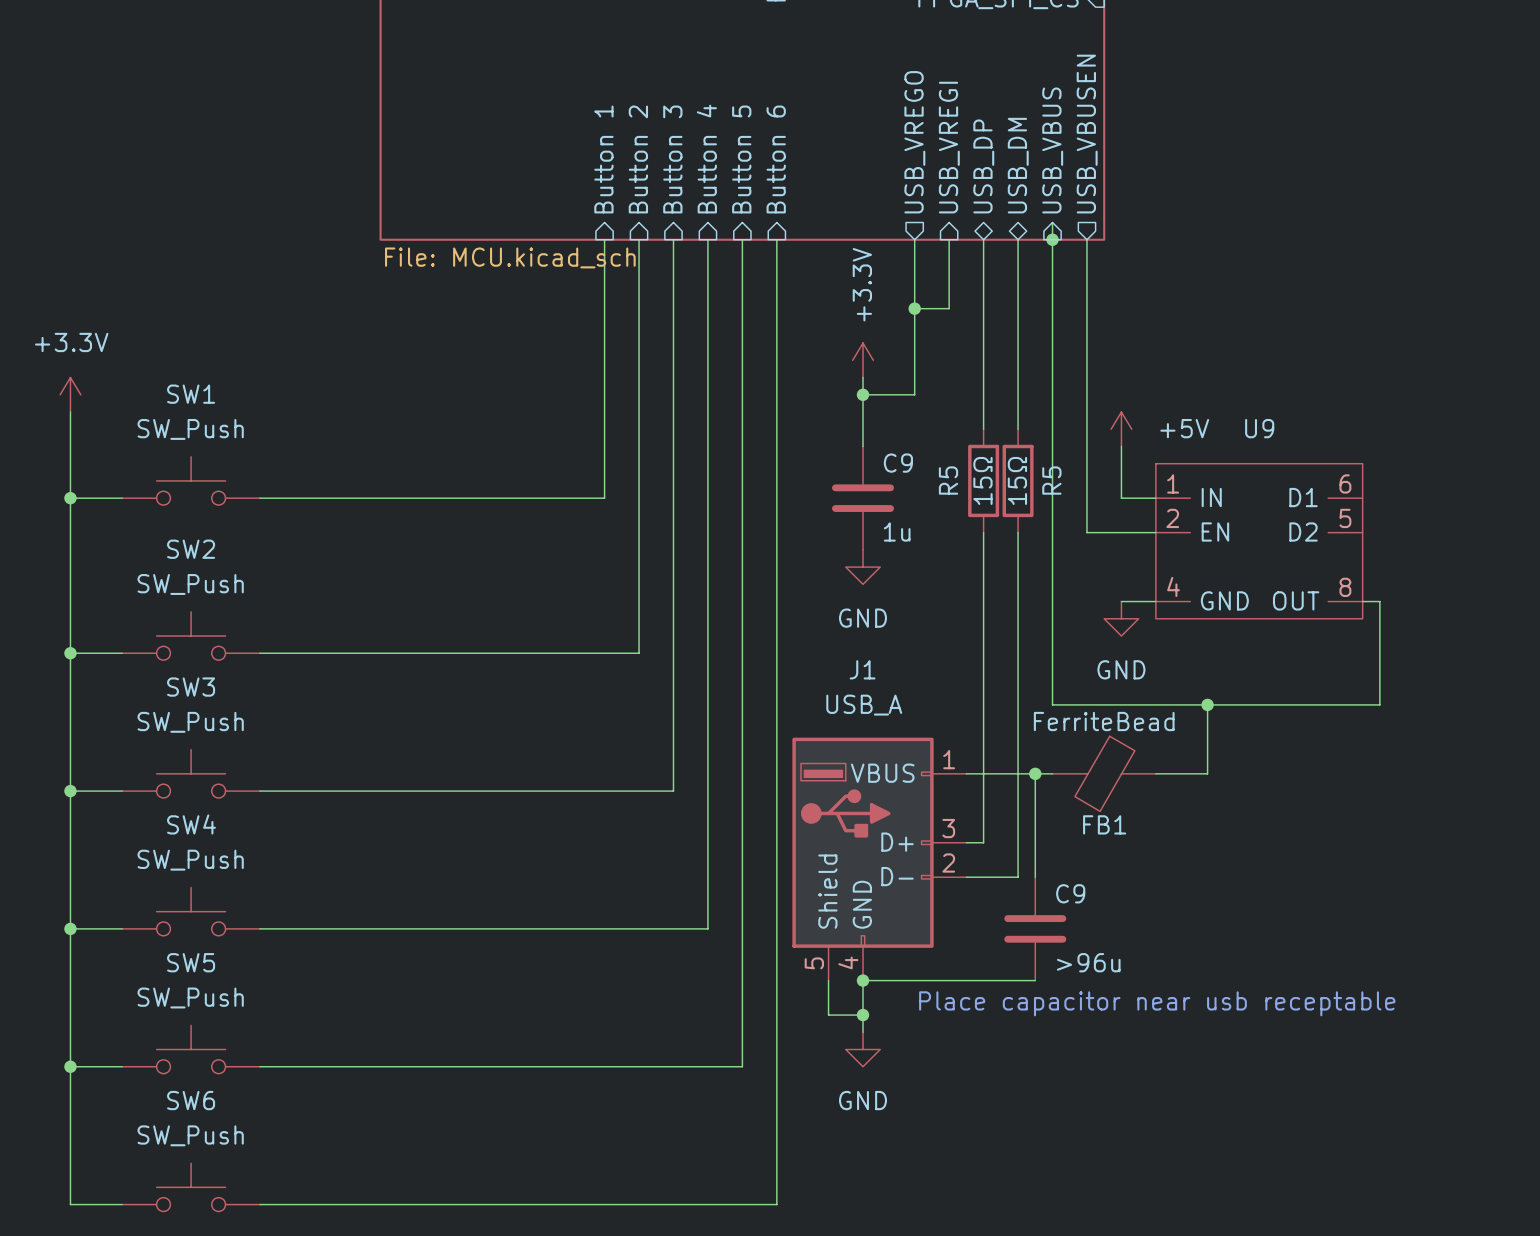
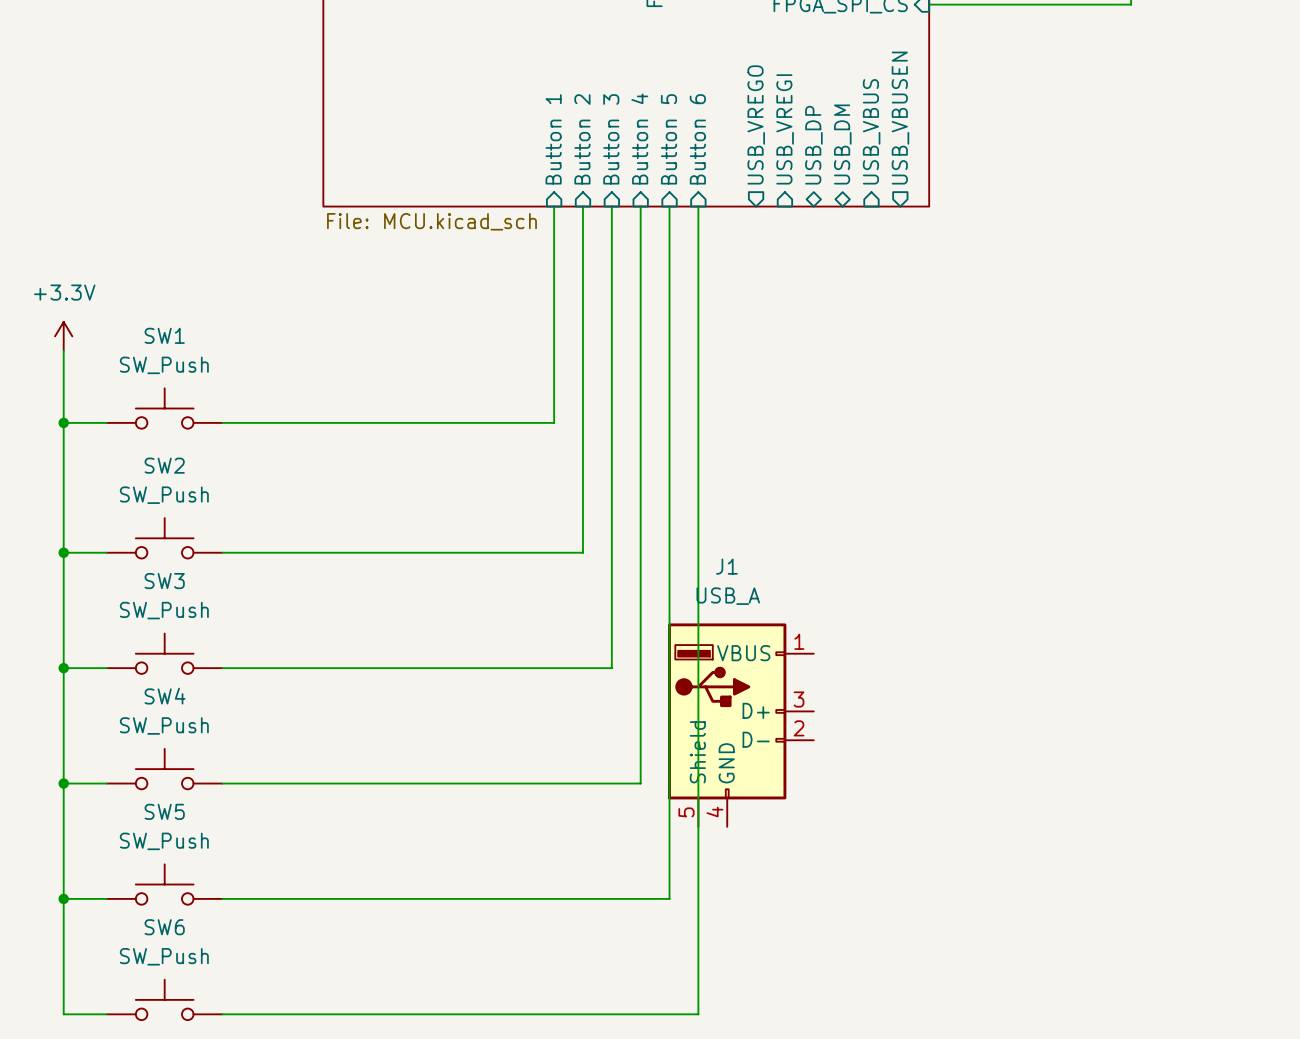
sheet pin position: USB_VBUSEN (1087, 134) -> USB_VBUSEN (900, 118)
sheet pin position: USB_VREGO (914, 142) -> USB_VREGO (756, 124)
sheet pin position: USB_VREGI (949, 147) -> USB_VREGI (785, 129)
sheet pin position: USB_VBUS (1052, 150) -> USB_VBUS (871, 131)
sheet pin position: Button 1 (603, 159) -> Button 1 (553, 139)
sheet pin position: Button 2 (638, 159) -> Button 2 (582, 139)
sheet pin position: Button 3 (672, 159) -> Button 3 (611, 139)
sheet pin position: Button 4 (706, 159) -> Button 4 (639, 139)
sheet pin position: Button 5 (741, 159) -> Button 5 (668, 139)
sheet pin position: Button 6 (776, 159) -> Button 6 (697, 139)
sheet pin position: USB_DM (1018, 165) -> USB_DM (842, 144)
sheet pin position: USB_DP (983, 166) -> USB_DP (813, 145)
wire: (1052, 222) (1052, 704) (1379, 704) (1379, 601) (1362, 601) -> none
wire: (604, 239) (604, 498) -> (554, 206) (554, 422) (510, 422)
wire: (639, 239) (639, 653) -> (582, 206) (582, 552) (539, 552)
wire: (673, 239) (673, 791) -> (611, 206) (611, 668) (568, 668)
wire: (707, 239) (707, 928) -> (640, 206) (640, 783) (597, 783)
wire: (742, 239) (742, 1066) -> (669, 206) (669, 898) (626, 898)
wire: (776, 239) (776, 1204) -> none
wire: none -> (698, 206) (698, 826)
wire: (914, 239) (914, 394) (863, 394) -> none
wire: (949, 239) (949, 308) (914, 308) -> none
wire: (983, 239) (983, 429) -> none
wire: (1018, 239) (1018, 429) -> none
junction: (1052, 239) -> none
wire: (1086, 239) (1086, 532) (1155, 532) -> none
junction: (914, 308) -> none
power symbol: +3.3V (863, 360) -> none
wire: (863, 377) (863, 446) -> none
junction: (863, 394) -> none
power symbol: +5V (1121, 429) -> none
wire: (1121, 446) (1121, 498) (1155, 498) -> none
R5: 15Ω (983, 480) -> none
R5: 15Ω (1018, 480) -> none
C9: 1u (863, 498) -> none
wire: (983, 532) (983, 842) (966, 842) -> none
wire: (1018, 532) (1018, 877) (966, 877) -> none
U9: (1259, 541) -> none
power symbol: GND (863, 567) -> none
wire: (1121, 601) (1155, 601) -> none
power symbol: GND (1121, 618) -> none
wire: (1207, 704) (1207, 773) (1155, 773) -> none
junction: (1207, 704) -> none
wire: (966, 773) (1052, 773) -> none
wire: (1035, 773) (1035, 877) -> none
junction: (1035, 773) -> none
FB1: FerriteBead (1104, 773) -> none
C9: >96u (1035, 928) -> none
junction: (863, 980) -> none
wire: (1035, 980) (863, 980) (863, 1032) -> none
text: Place capacitor near usb receptable (1157, 1003) -> none
wire: (828, 1015) (863, 1015) -> (698, 855) (698, 1014) (655, 1014)
junction: (863, 1015) -> none
power symbol: GND (863, 1049) -> none

